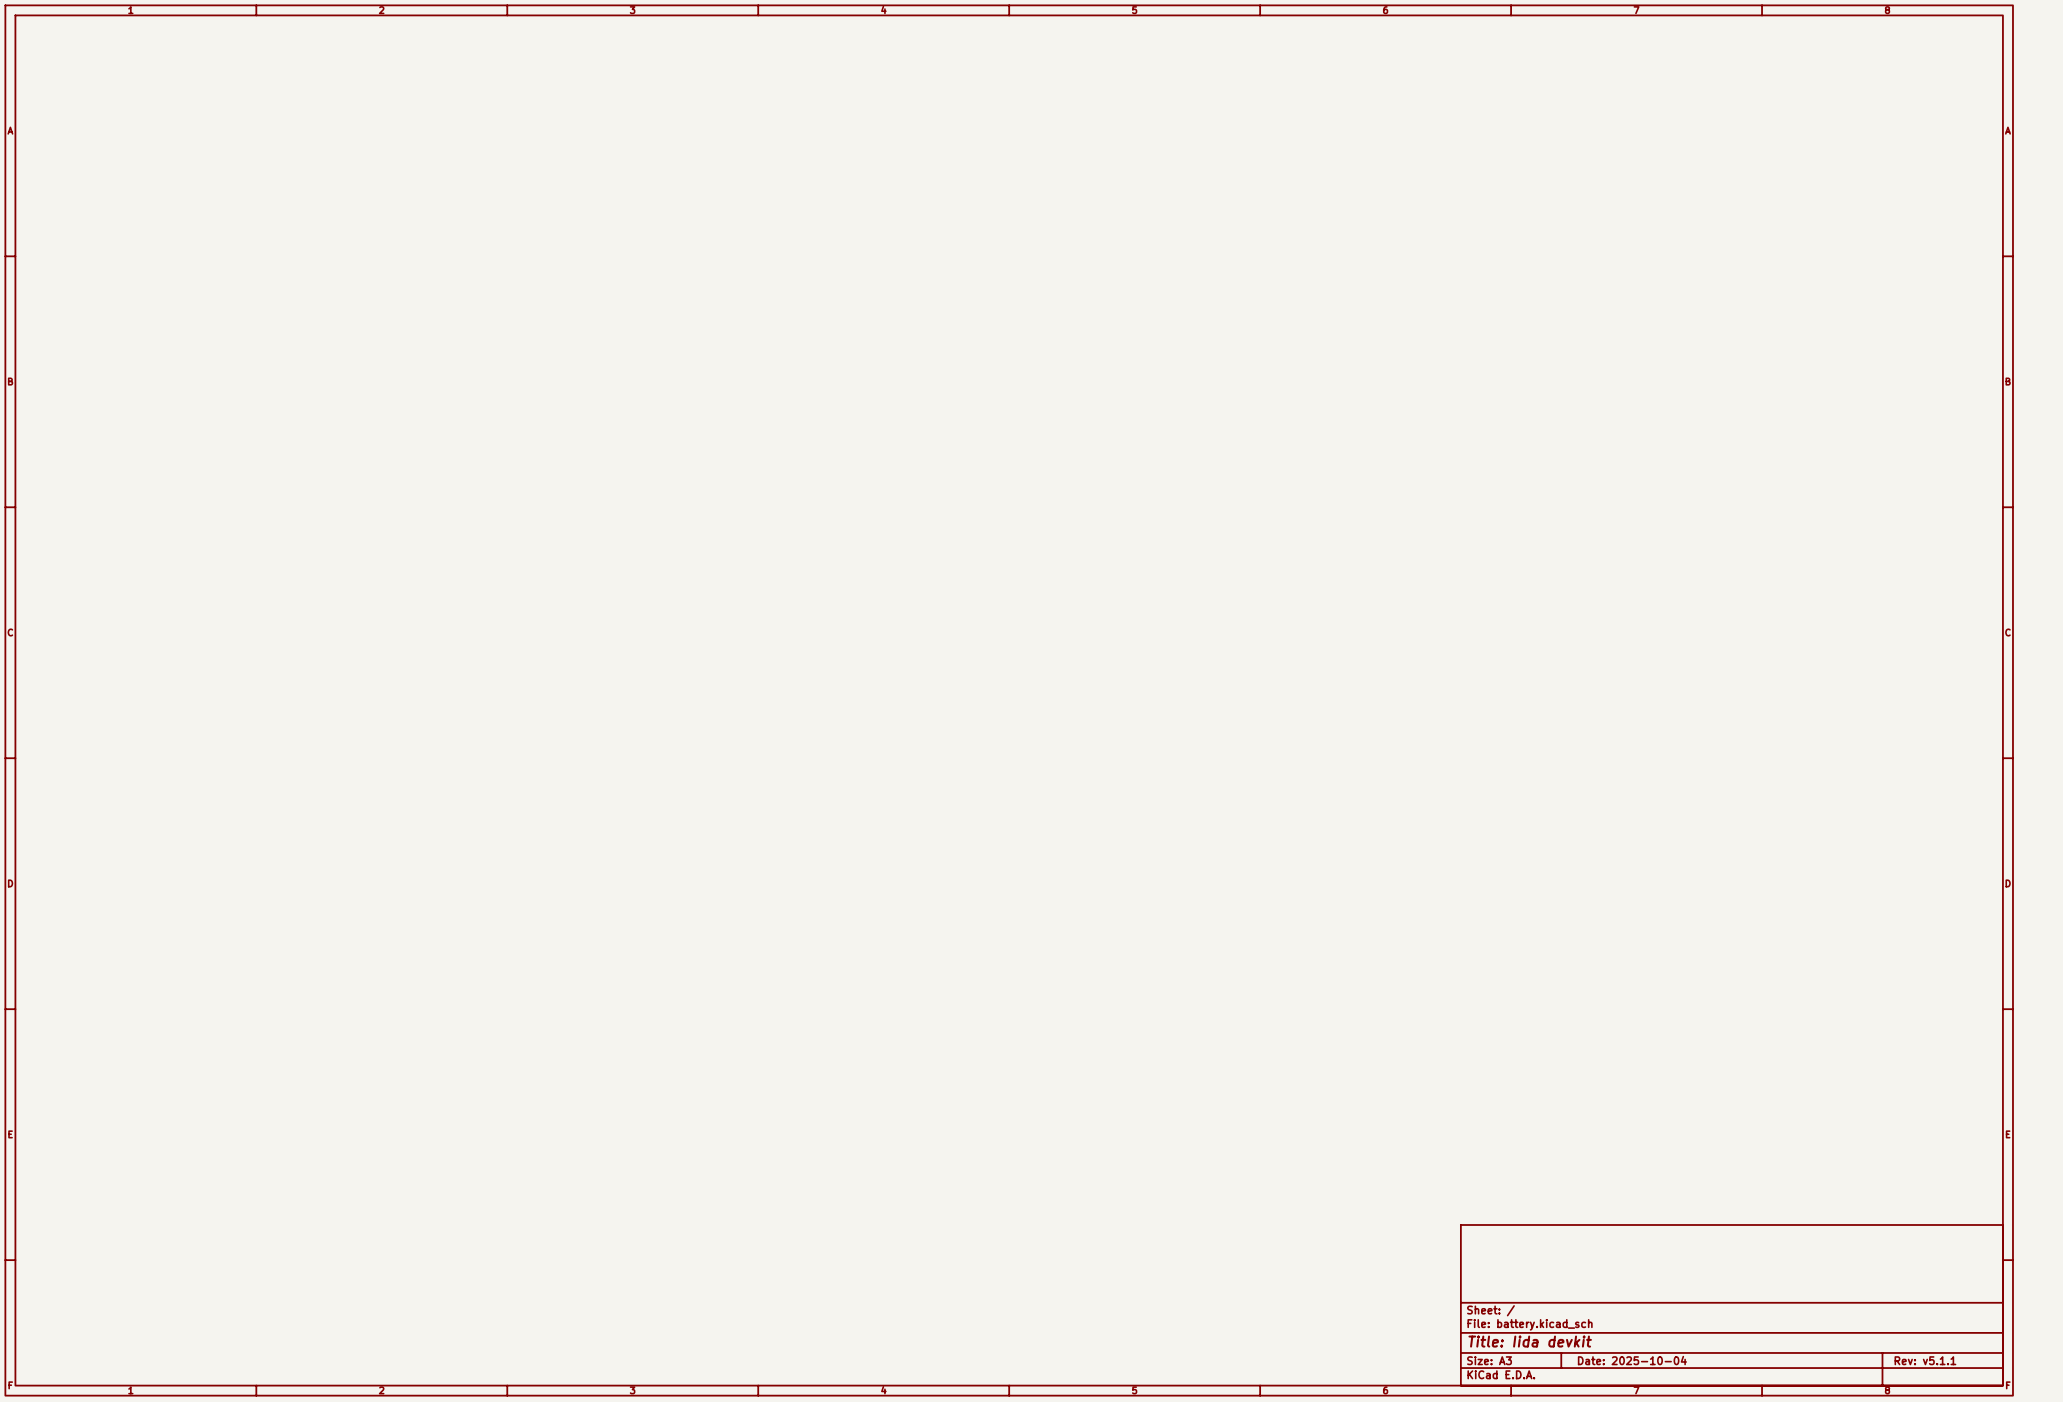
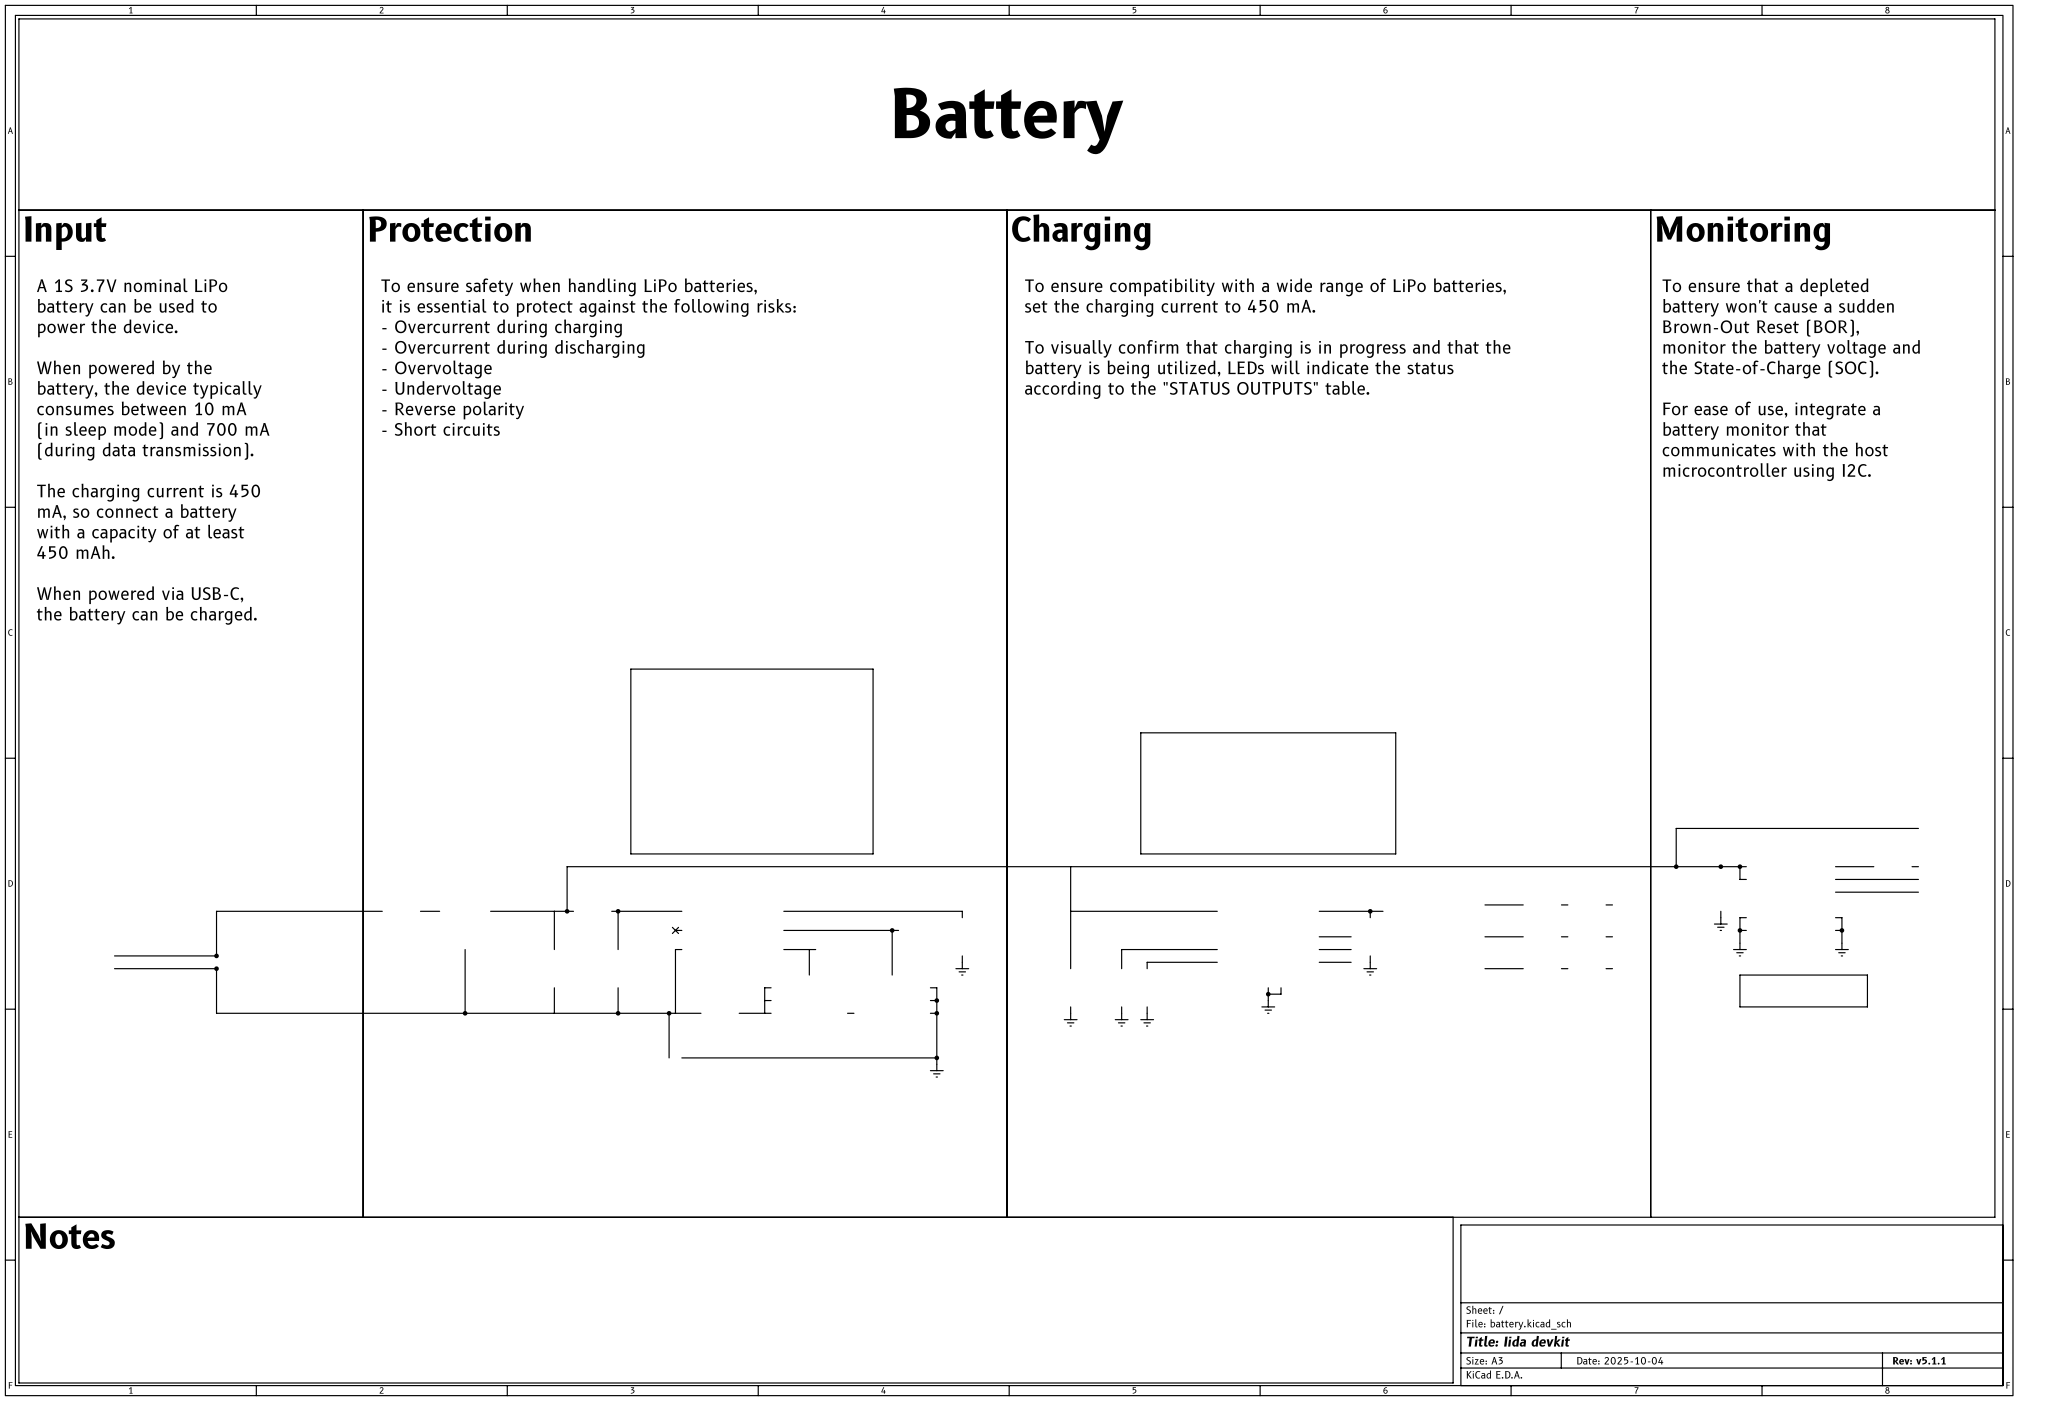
text: none -> Battery (1008, 120)
line: none -> (18, 210) (1994, 210)
line: none -> (363, 210) (363, 1217)
line: none -> (1006, 210) (1006, 1217)
line: none -> (1650, 210) (1650, 1217)
text: none -> Protection (450, 229)
text: none -> Input (65, 233)
text: none -> Charging (1081, 232)
text: none -> Monitoring (1743, 233)
text: none -> A 1S 3.7V nominal LiPo (132, 285)
text: none -> To ensure safety when handling LiPo batteries, (569, 287)
text: none -> To ensure compatibility with a wide range of LiPo batteries, (1265, 287)
text: none -> To ensure that a depleted (1765, 287)
text: none -> battery can be used to (127, 307)
text: none -> it is essential to protect against the following risks: (589, 307)
text: none -> set the charging current to 450 mA. (1170, 307)
text: none -> battery won't cause a sudden (1778, 307)
text: none -> power the device. (107, 328)
text: none -> - Overcurrent during charging (502, 328)
text: none -> Brown-Out Reset (BOR), (1761, 328)
text: none -> - Overcurrent during discharging (513, 348)
text: none -> To visually confirm that charging is in progress and that the (1267, 348)
text: none -> monitor the battery voltage and (1791, 348)
text: none -> When powered by the (124, 369)
text: none -> - Overvoltage (437, 369)
text: none -> battery is being utilized, LEDs will indicate the status (1239, 369)
text: none -> the State-of-Charge (SOC). (1770, 369)
text: none -> battery, the device typically (149, 389)
text: none -> - Undervoltage (441, 390)
text: none -> according to the "STATUS OUTPUTS" table. (1197, 390)
text: none -> consumes between 10 mA (141, 408)
text: none -> - Reverse polarity (453, 410)
text: none -> For ease of use, integrate a (1771, 410)
text: none -> - Short circuits (441, 428)
text: none -> (in sleep mode) and 700 mA (153, 431)
text: none -> battery monitor that (1744, 430)
text: none -> communicates with the host (1775, 449)
text: none -> (during data transmission). (145, 451)
text: none -> microcontroller using I2C. (1767, 472)
text: none -> The charging current is 450 (148, 492)
text: none -> mA, so connect a battery (137, 513)
text: none -> with a capacity of at least (140, 533)
text: none -> 450 mAh. (75, 552)
text: none -> When powered via USB-C, (140, 595)
text: none -> the battery can be charged. (146, 615)
line: none -> (630, 669) (873, 669) (873, 853) (630, 853) (630, 669)
line: none -> (1140, 732) (1395, 732) (1395, 853) (1140, 853) (1140, 732)
wire: none -> (1918, 828) (1676, 828) (1676, 866)
wire: none -> (1070, 866) (1070, 968)
junction: none -> (1676, 866)
junction: none -> (1720, 866)
wire: none -> (1739, 866) (1739, 879) (1746, 879)
junction: none -> (1739, 866)
wire: none -> (1746, 866) (567, 866) (567, 911)
wire: none -> (1835, 866) (1873, 866)
wire: none -> (1912, 866) (1918, 866)
wire: none -> (1835, 879) (1918, 879)
wire: none -> (1835, 892) (1918, 892)
wire: none -> (1484, 904) (1523, 904)
wire: none -> (1561, 904) (1567, 904)
wire: none -> (1606, 904) (1612, 904)
wire: none -> (382, 911) (216, 911) (216, 955) (114, 955)
wire: none -> (420, 911) (439, 911)
wire: none -> (490, 911) (573, 911)
wire: none -> (554, 911) (554, 949)
junction: none -> (567, 911)
wire: none -> (611, 911) (681, 911)
wire: none -> (618, 911) (618, 949)
junction: none -> (618, 911)
wire: none -> (783, 911) (962, 911) (962, 917)
wire: none -> (1070, 911) (1217, 911)
wire: none -> (1319, 911) (1382, 911)
wire: none -> (1370, 911) (1370, 917)
junction: none -> (1370, 911)
wire: none -> (1720, 911) (1720, 917)
wire: none -> (1746, 917) (1739, 917) (1739, 943)
wire: none -> (1835, 917) (1841, 917) (1841, 943)
power symbol: none -> (1720, 924)
wire: none -> (675, 930) (681, 930)
no-connect mark: none -> (675, 930)
wire: none -> (783, 930) (898, 930)
wire: none -> (892, 930) (892, 975)
junction: none -> (892, 930)
wire: none -> (1739, 930) (1746, 930)
junction: none -> (1739, 930)
wire: none -> (1835, 930) (1841, 930)
junction: none -> (1841, 930)
wire: none -> (1319, 936) (1351, 936)
wire: none -> (1484, 936) (1523, 936)
wire: none -> (1561, 936) (1567, 936)
wire: none -> (1606, 936) (1612, 936)
wire: none -> (465, 949) (465, 1013)
wire: none -> (681, 949) (675, 949) (675, 1013)
wire: none -> (783, 949) (815, 949)
wire: none -> (809, 949) (809, 975)
wire: none -> (1217, 949) (1121, 949) (1121, 968)
wire: none -> (1319, 949) (1351, 949)
power symbol: none -> (1739, 949)
power symbol: none -> (1841, 949)
junction: none -> (216, 955)
wire: none -> (962, 955) (962, 962)
wire: none -> (1370, 955) (1370, 962)
wire: none -> (1217, 962) (1147, 962) (1147, 968)
wire: none -> (1319, 962) (1351, 962)
wire: none -> (114, 968) (216, 968) (216, 1013) (700, 1013)
junction: none -> (216, 968)
power symbol: none -> (962, 968)
power symbol: none -> (1370, 968)
wire: none -> (1484, 968) (1523, 968)
wire: none -> (1561, 968) (1567, 968)
wire: none -> (1606, 968) (1612, 968)
line: none -> (1739, 975) (1867, 975) (1867, 1006) (1739, 1006) (1739, 975)
wire: none -> (554, 987) (554, 1013)
wire: none -> (618, 987) (618, 1013)
wire: none -> (771, 987) (764, 987) (764, 1013)
wire: none -> (930, 987) (936, 987) (936, 1064)
wire: none -> (1268, 987) (1268, 1000)
wire: none -> (1281, 987) (1281, 994) (1268, 994)
junction: none -> (1268, 994)
wire: none -> (764, 1000) (771, 1000)
wire: none -> (930, 1000) (936, 1000)
junction: none -> (936, 1000)
wire: none -> (1070, 1006) (1070, 1013)
wire: none -> (1121, 1006) (1121, 1013)
wire: none -> (1147, 1006) (1147, 1013)
power symbol: none -> (1268, 1006)
junction: none -> (465, 1013)
junction: none -> (618, 1013)
wire: none -> (669, 1013) (669, 1057)
junction: none -> (669, 1013)
wire: none -> (739, 1013) (771, 1013)
wire: none -> (847, 1013) (853, 1013)
wire: none -> (930, 1013) (936, 1013)
junction: none -> (936, 1013)
power symbol: none -> (1070, 1019)
power symbol: none -> (1121, 1019)
power symbol: none -> (1147, 1019)
wire: none -> (681, 1057) (936, 1057)
junction: none -> (936, 1057)
power symbol: none -> (936, 1070)
line: none -> (18, 1217) (1994, 1217) (1994, 18) (18, 18) (18, 1382) (1453, 1382) (1453, 1217)
text: none -> Notes (70, 1236)

